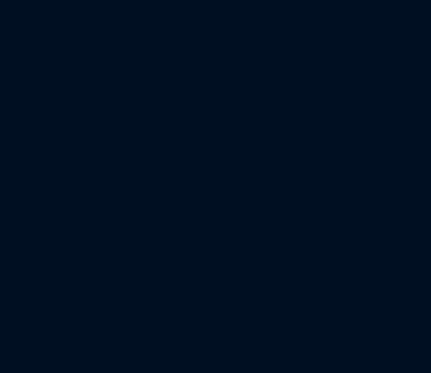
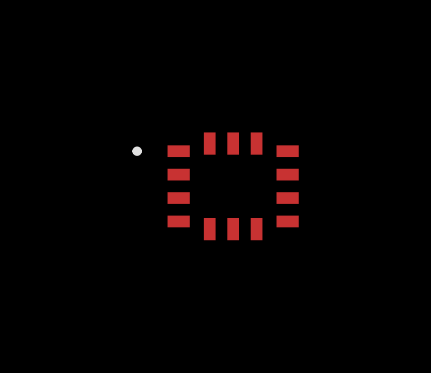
part: none -> (215, 186)

